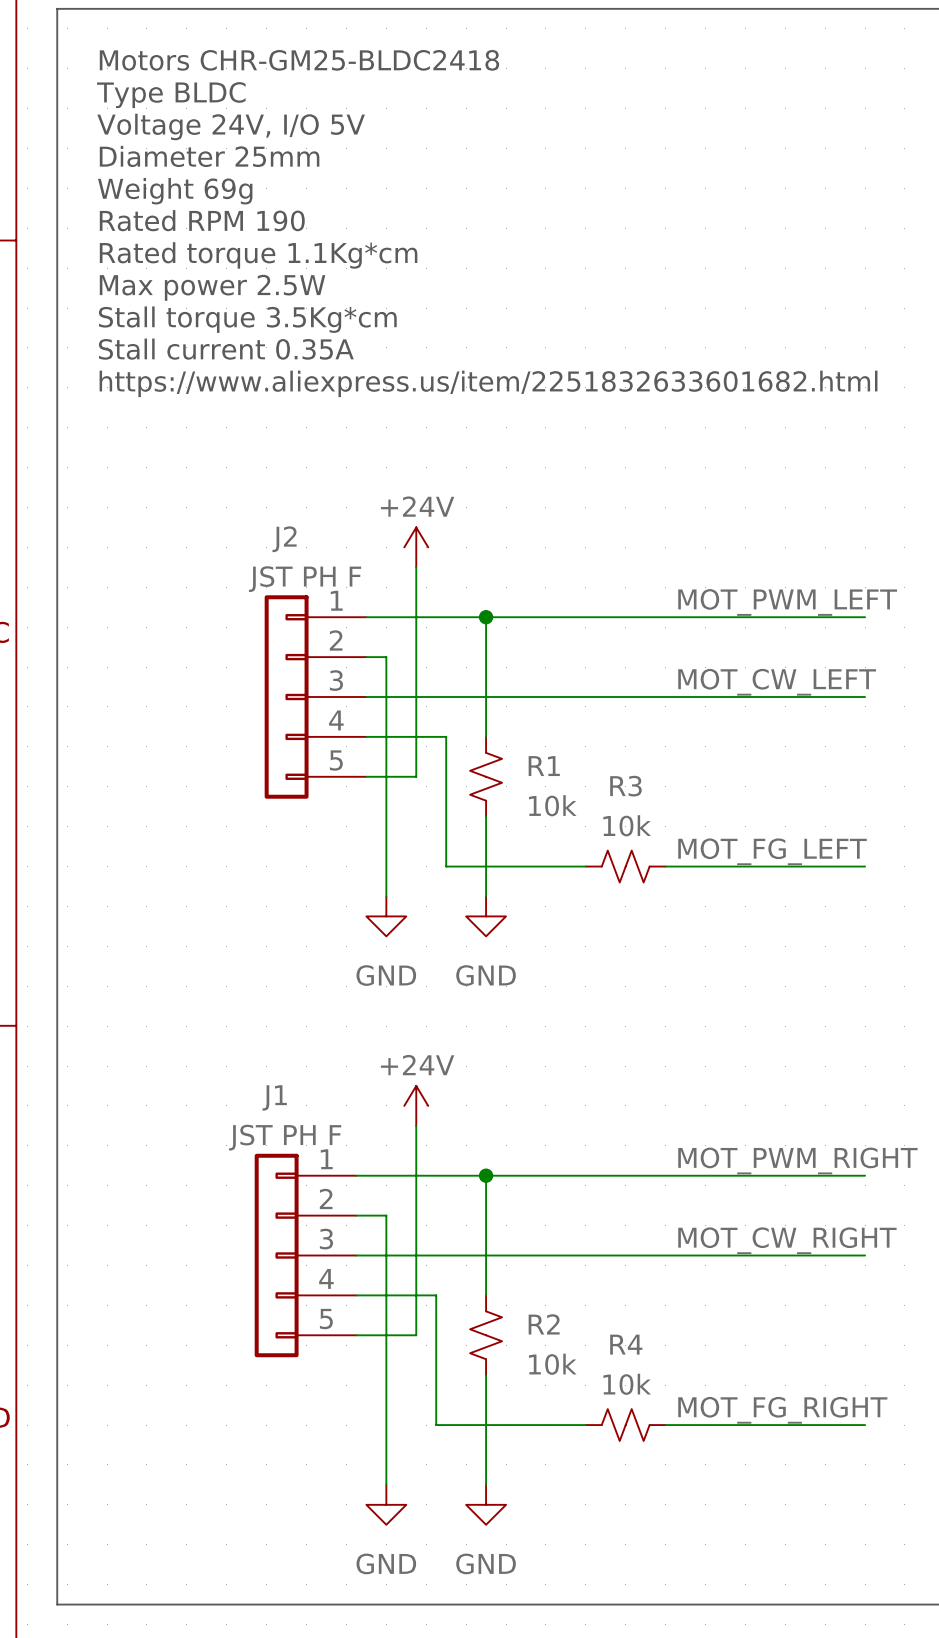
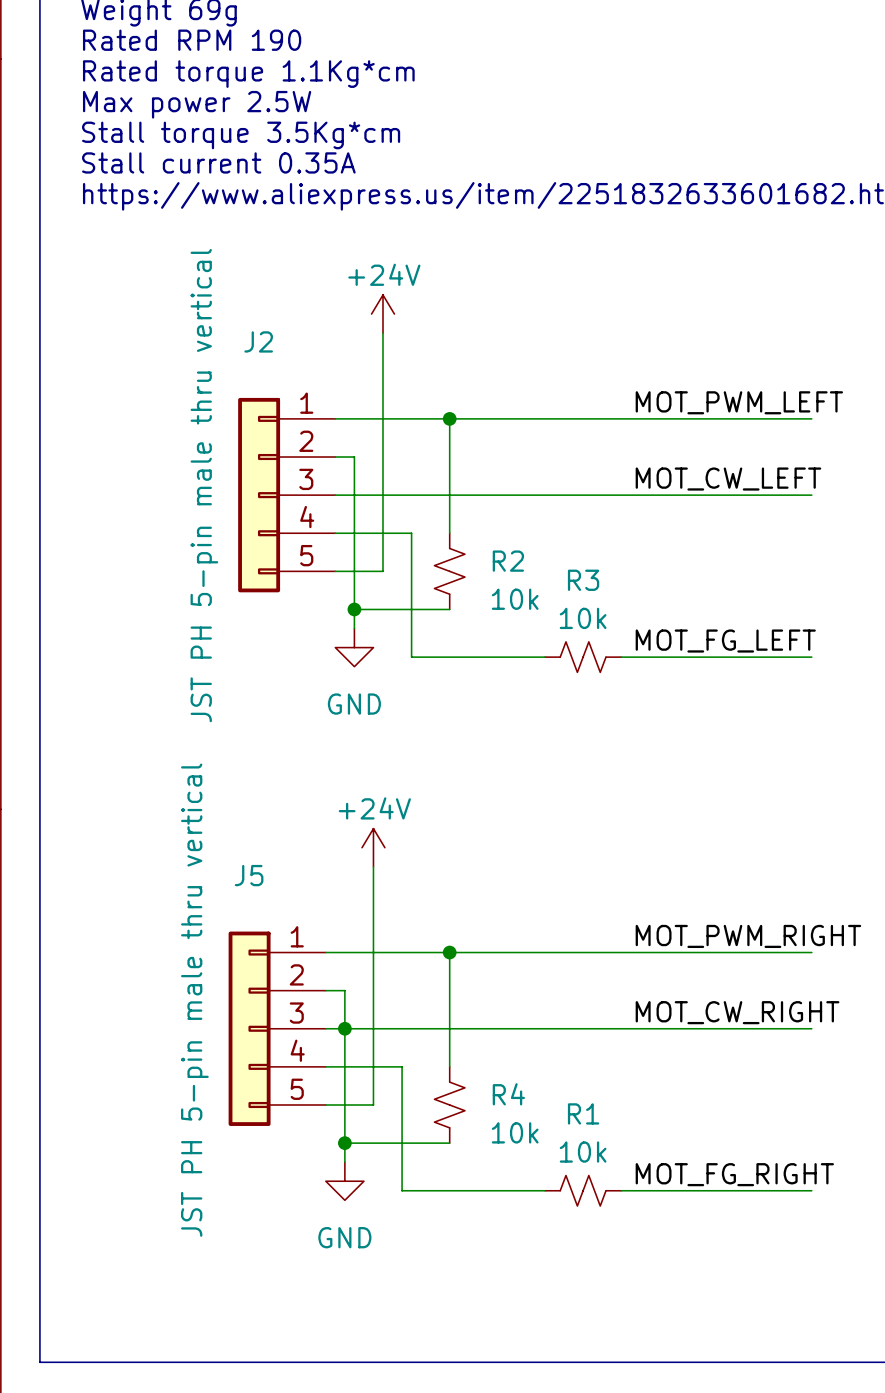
power symbol position: +24V (416, 547) -> +24V (382, 314)
J2 value: JST PH F (305, 579) -> JST PH 5-pin male thru vertical (204, 485)
R1 name: R1 (544, 766) -> R2 (508, 561)
junction: none -> (354, 609)
wire: (486, 816) (486, 896) -> (449, 609) (354, 609)
wire: (386, 836) (386, 896) -> none
power symbol: none -> GND (354, 647)
power symbol: GND (386, 916) -> none
power symbol: GND (486, 916) -> none
J1 name: J1 (274, 1097) -> J5 (249, 875)
power symbol position: +24V (416, 1105) -> +24V (373, 847)
wire: (416, 1125) (416, 1335) (406, 1335) -> (373, 866) (373, 1105)
J1 value: JST PH F (285, 1137) -> JST PH 5-pin male thru vertical (194, 1000)
wire: (376, 1215) (386, 1215) (386, 1484) -> (344, 990) (344, 1162)
junction: none -> (344, 1028)
R2 name: R2 (544, 1324) -> R4 (508, 1094)
R4 name: R4 (626, 1344) -> R1 (583, 1113)
junction: none -> (344, 1143)
wire: (486, 1375) (486, 1484) -> (449, 1143) (344, 1143)
power symbol: none -> GND (344, 1181)
power symbol: GND (386, 1504) -> none
power symbol: GND (486, 1504) -> none

